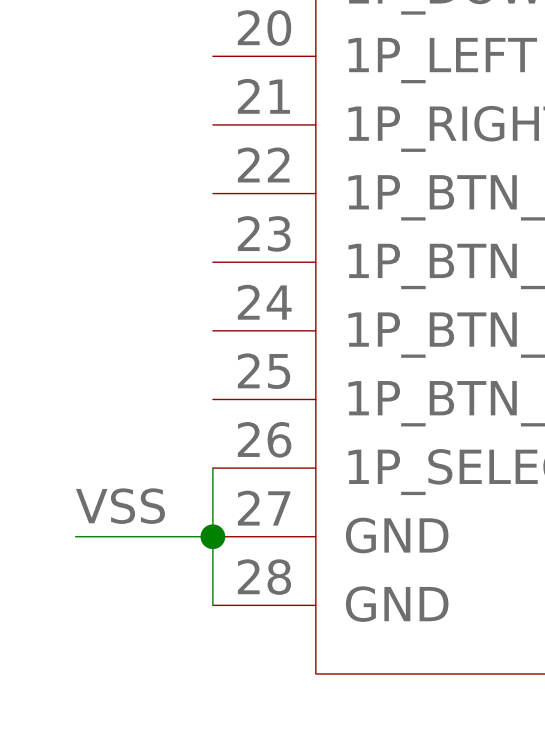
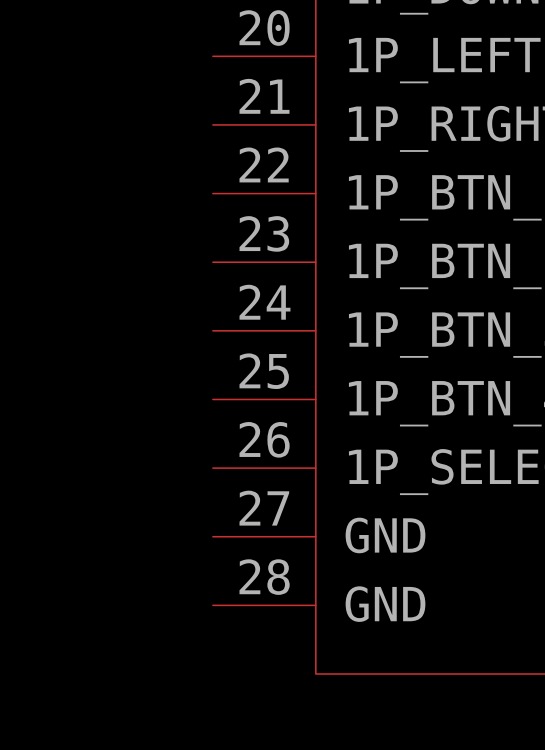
wire: (212, 468) (212, 605) -> none
label: VSS (120, 506) -> none
wire: (75, 536) (212, 536) -> none
junction: (212, 536) -> none

